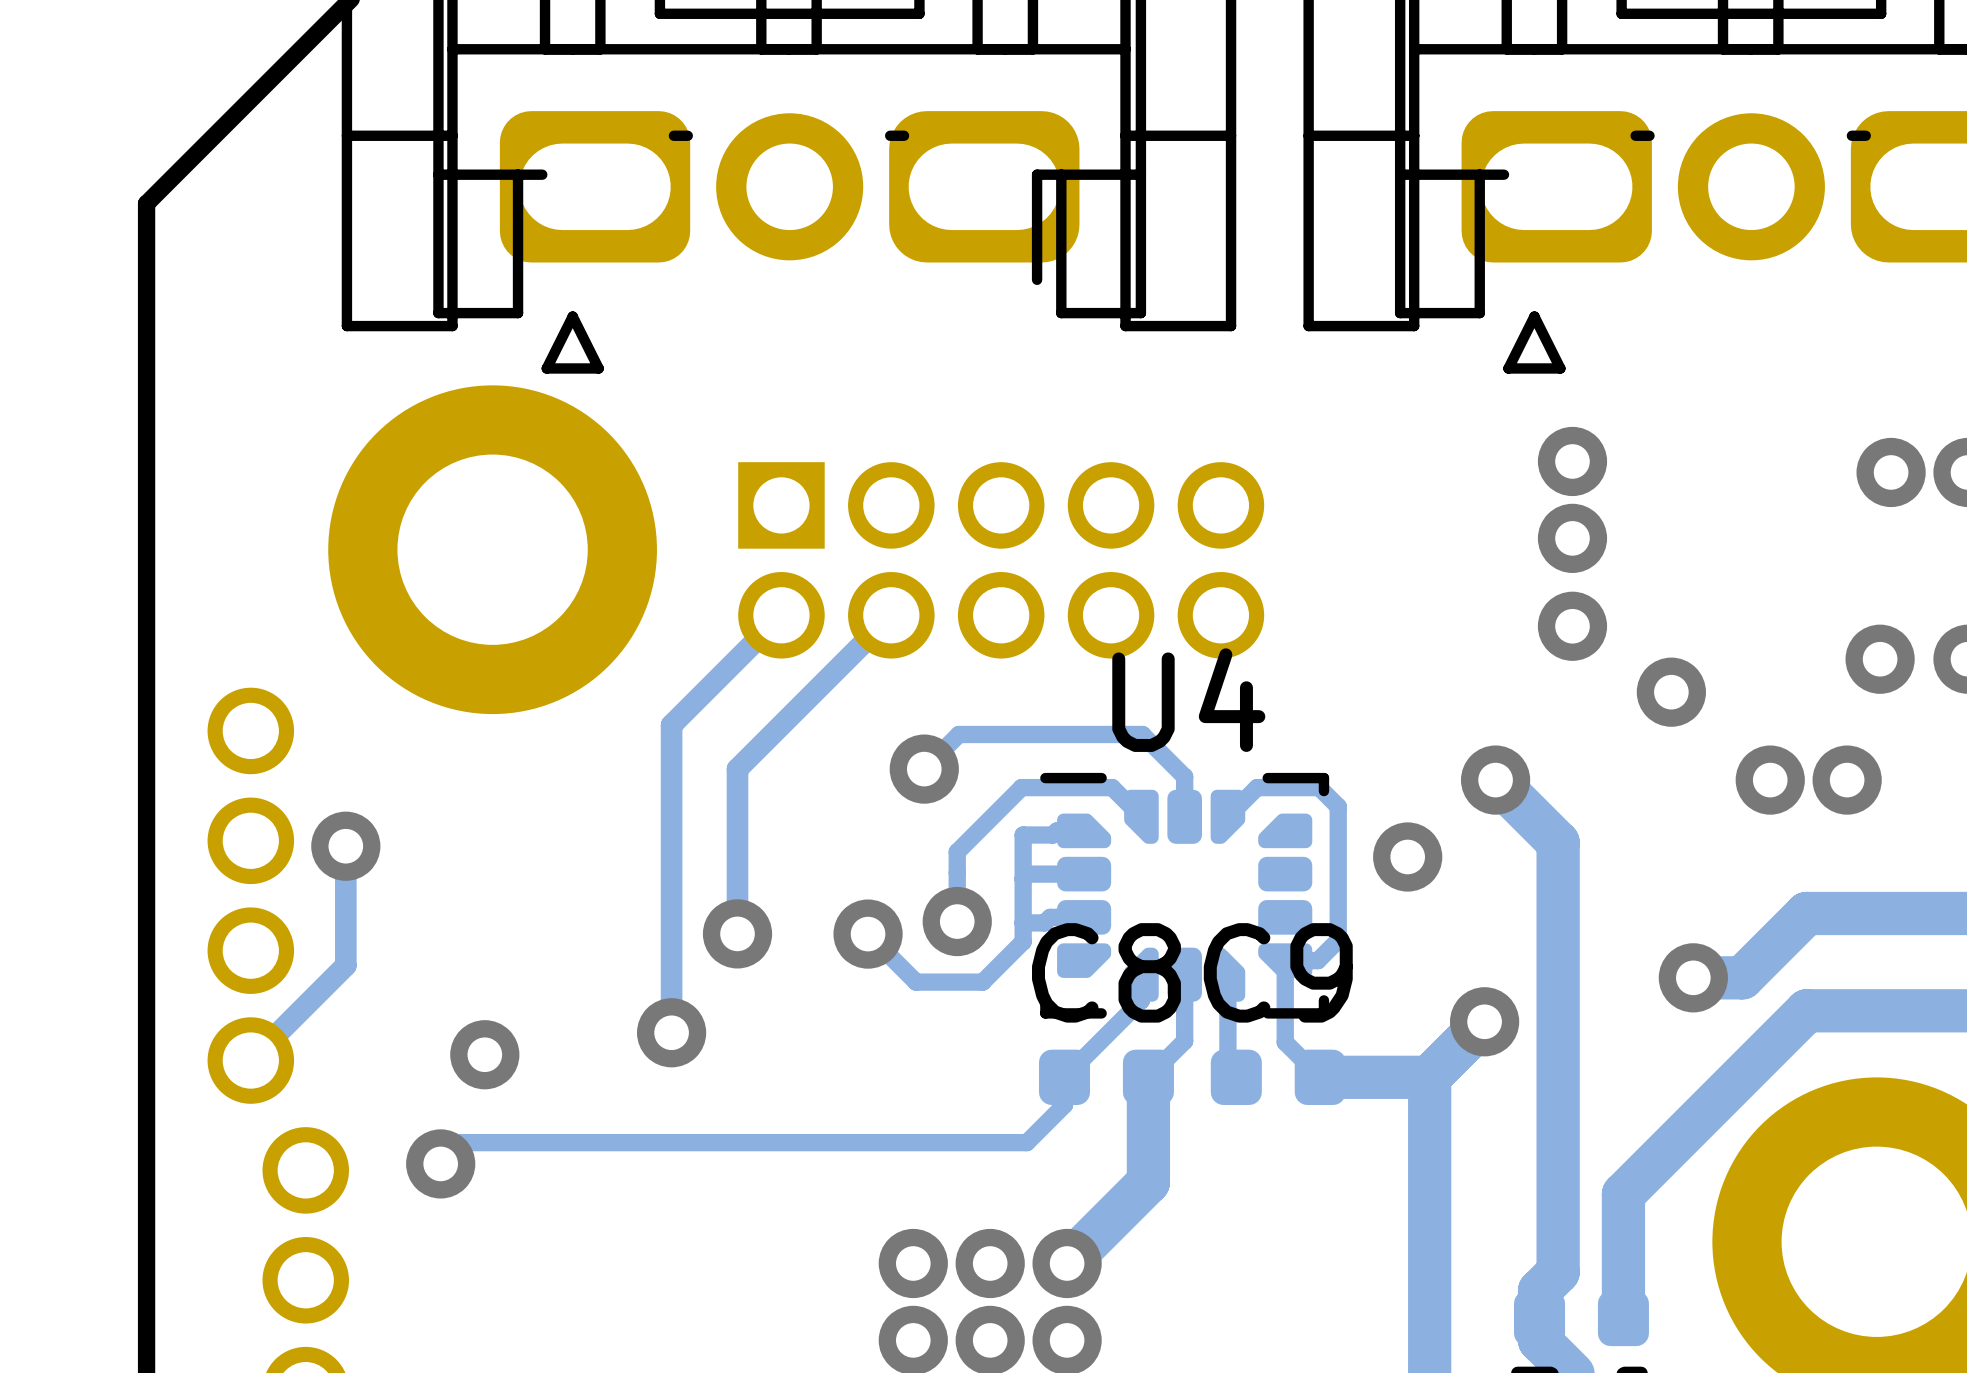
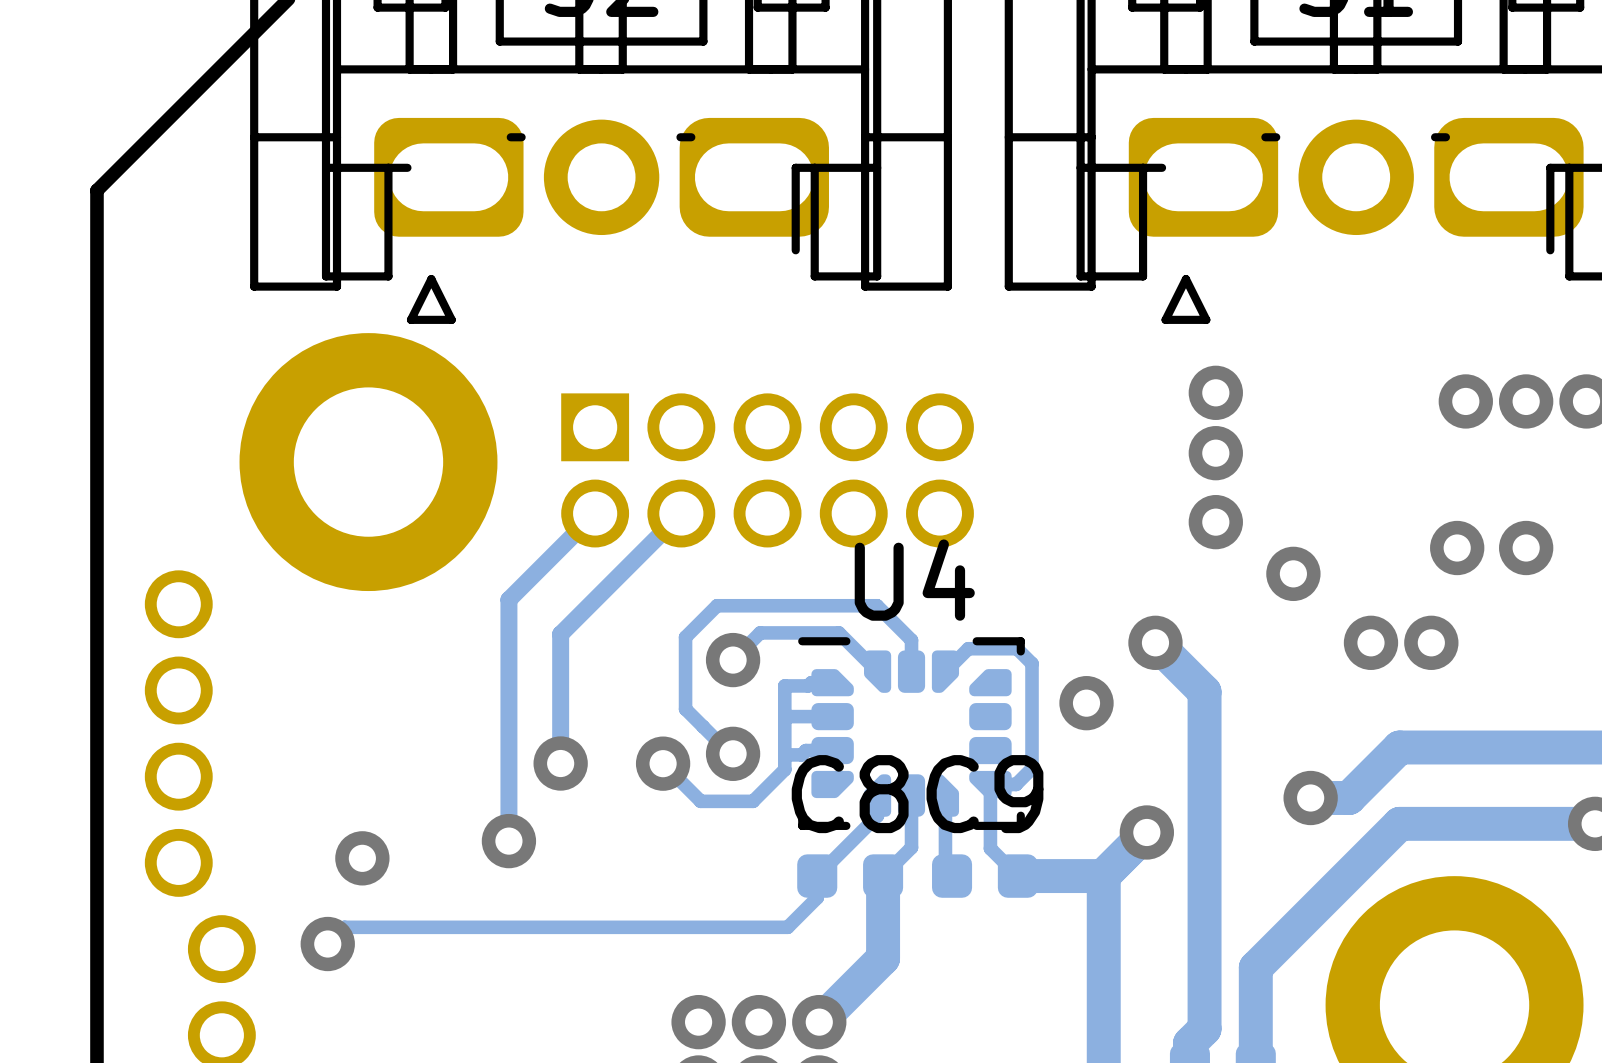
track: (1142, 734) (958, 734) (924, 769) -> (878, 607) (717, 605) (685, 637) (685, 709) (730, 753)
via position: (924, 769) -> (733, 660)
track: (1112, 787) (1021, 787) (957, 852) (957, 921) -> (854, 648) (838, 632) (760, 632) (733, 660)
track: (345, 846) (345, 965) (250, 1060) -> none
via: (345, 846) -> none

